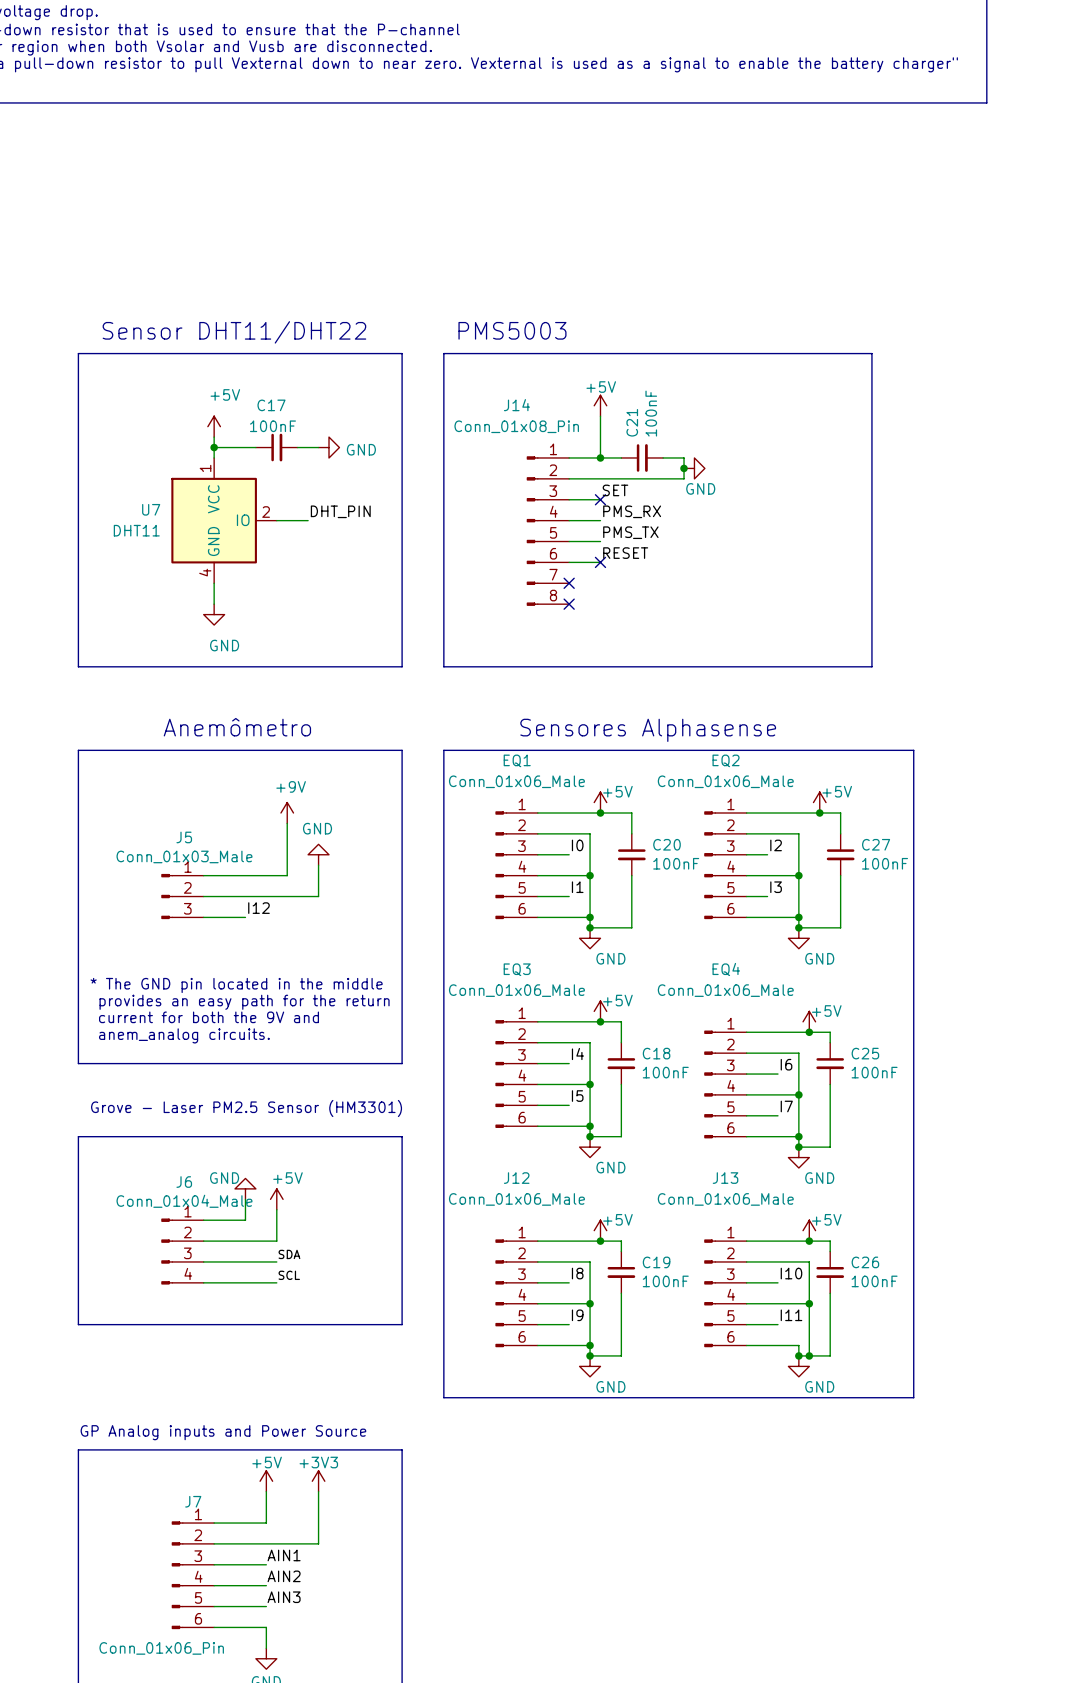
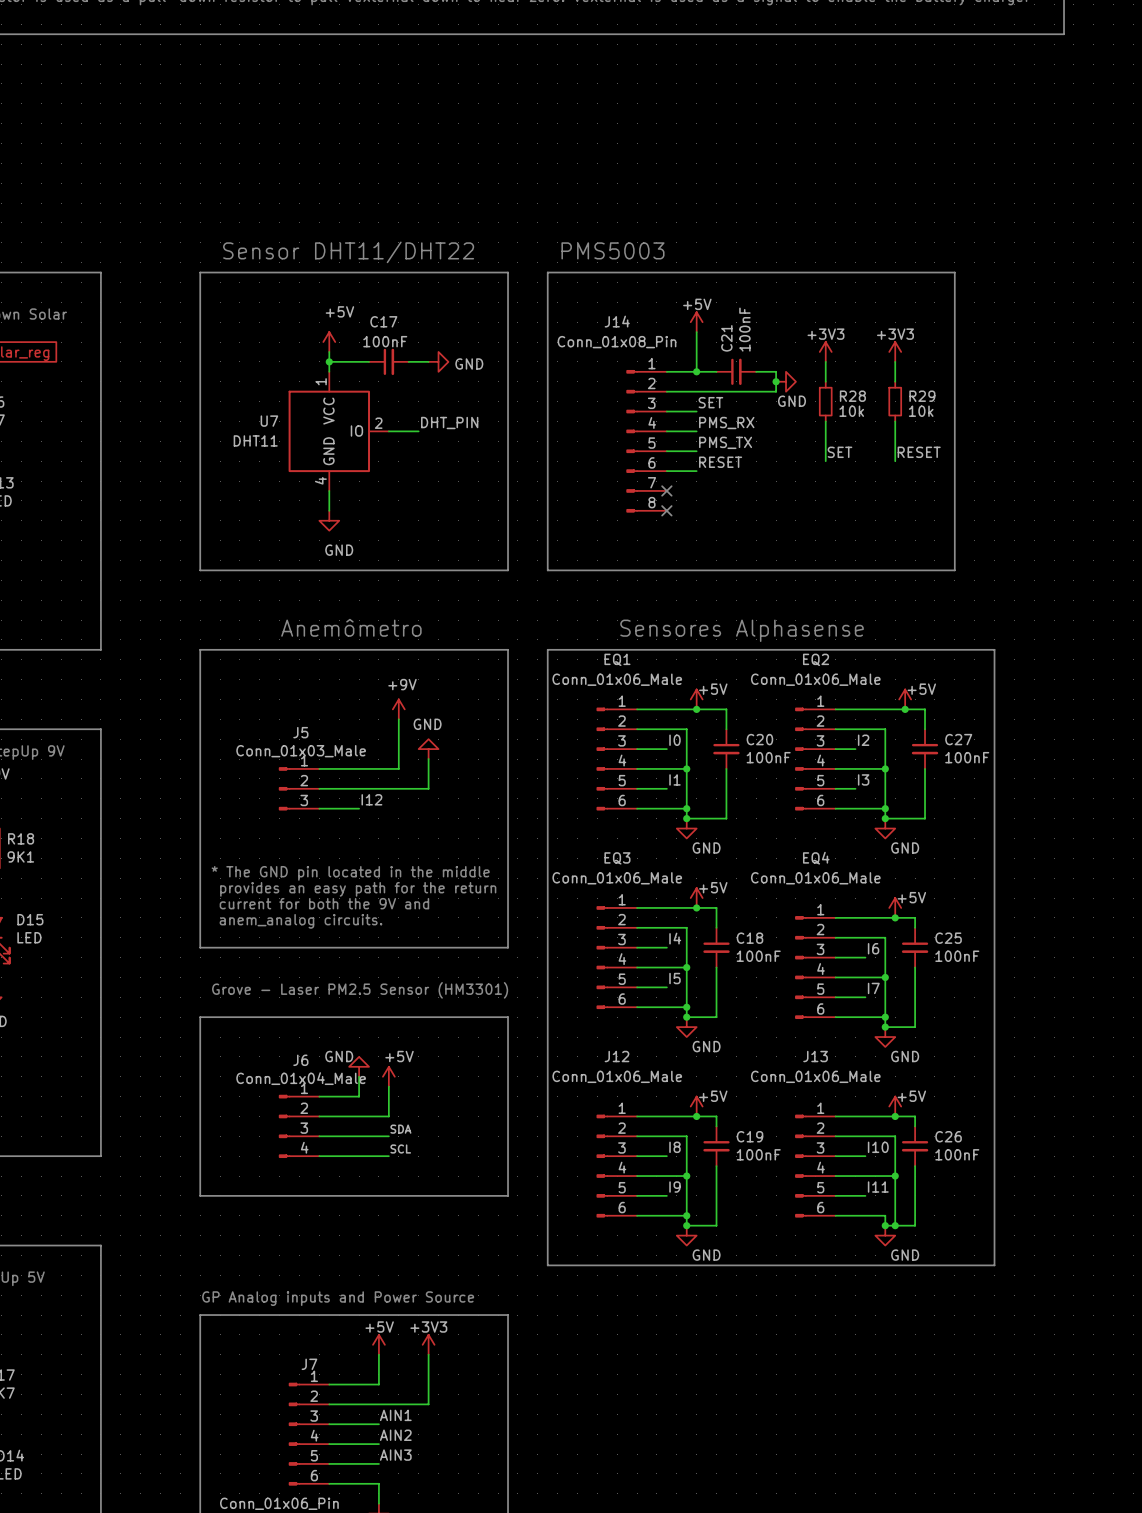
power symbol: none -> +3V3 (825, 351)
power symbol: none -> +3V3 (895, 351)
wire: none -> (825, 361) (825, 381)
wire: none -> (895, 361) (895, 381)
R28: none -> 10k (825, 401)
R29: none -> 10k (895, 401)
no-connect mark: (600, 499) -> none
wire: none -> (825, 421) (825, 461)
wire: none -> (895, 421) (895, 461)
label: none -> SET (839, 452)
label: none -> RESET (919, 452)
no-connect mark: (600, 562) -> none

